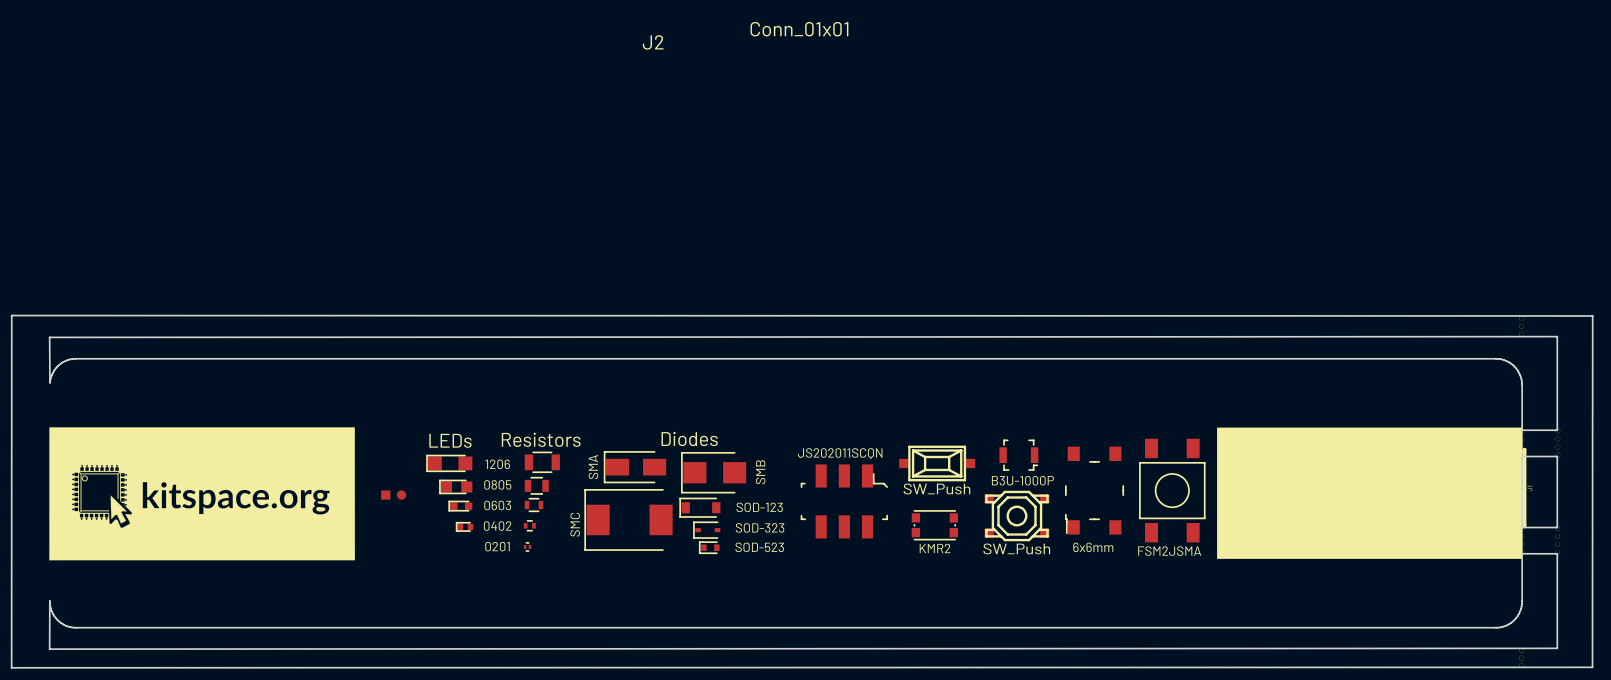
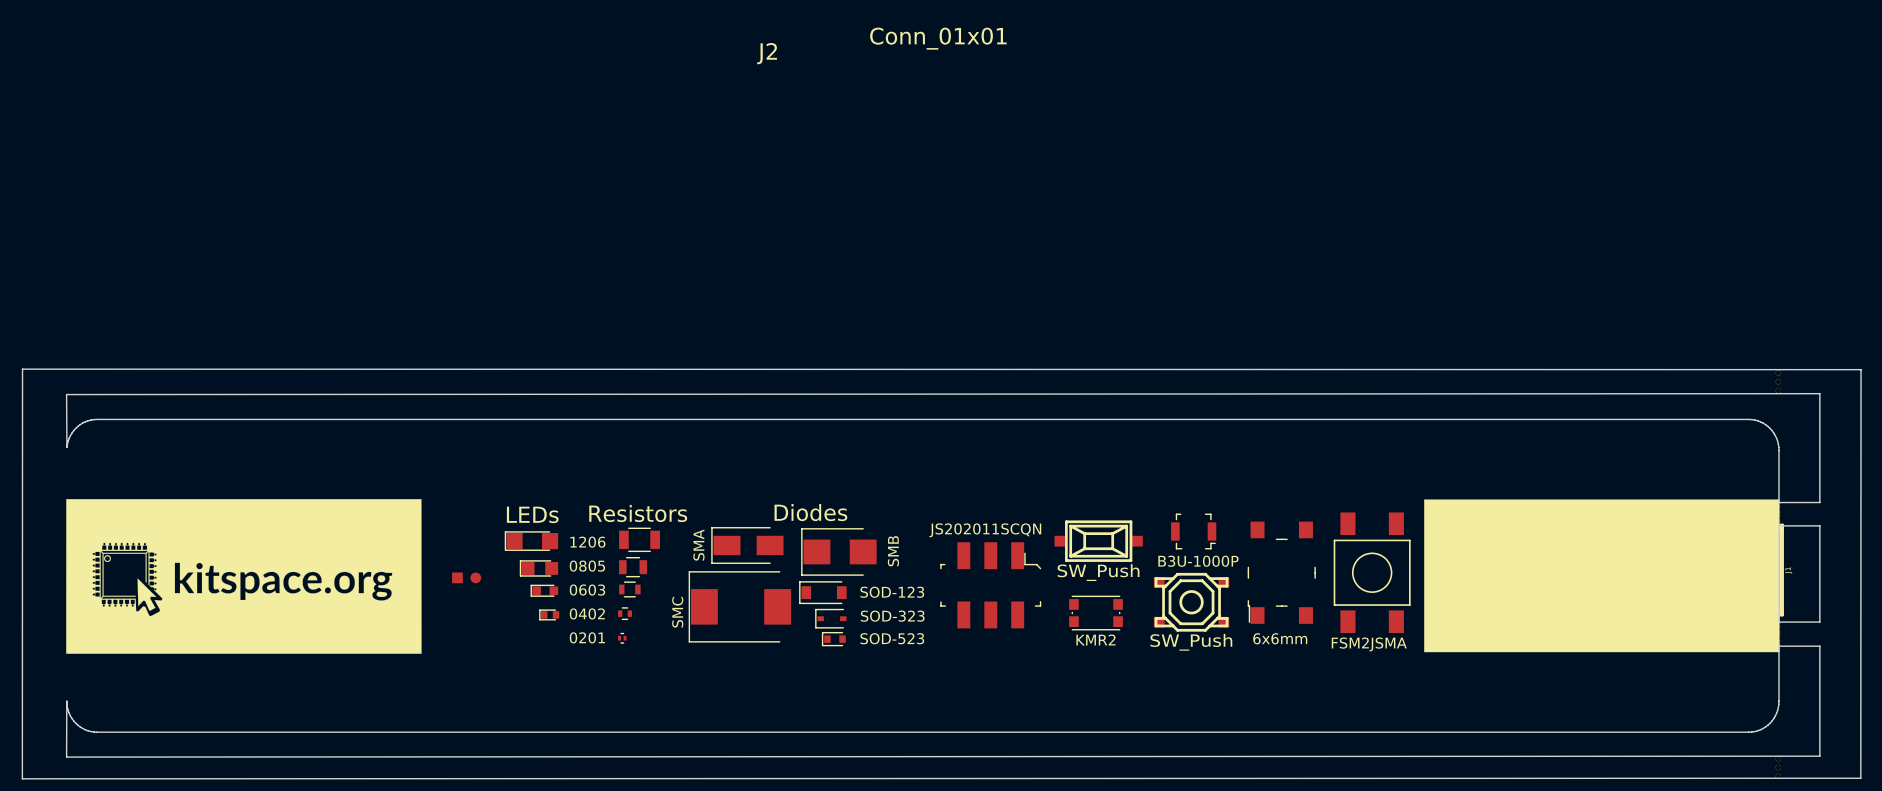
J2 footprint: [11, 315, 1594, 669] -> [21, 368, 1862, 780]

